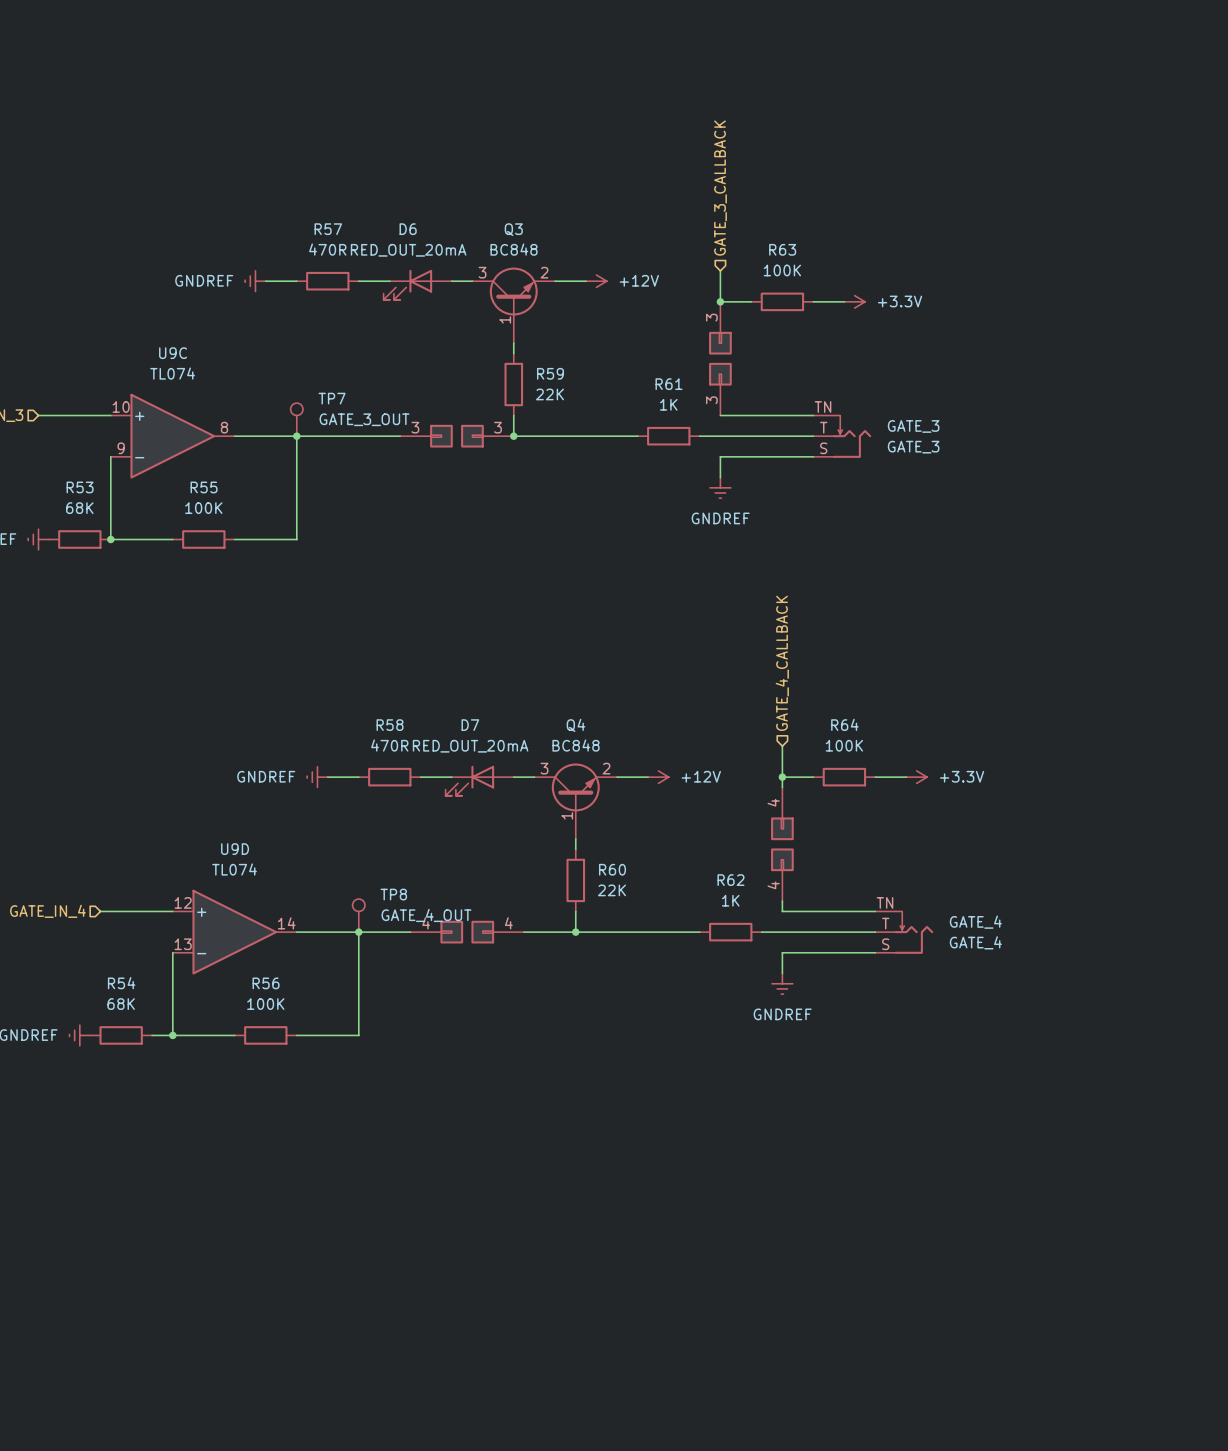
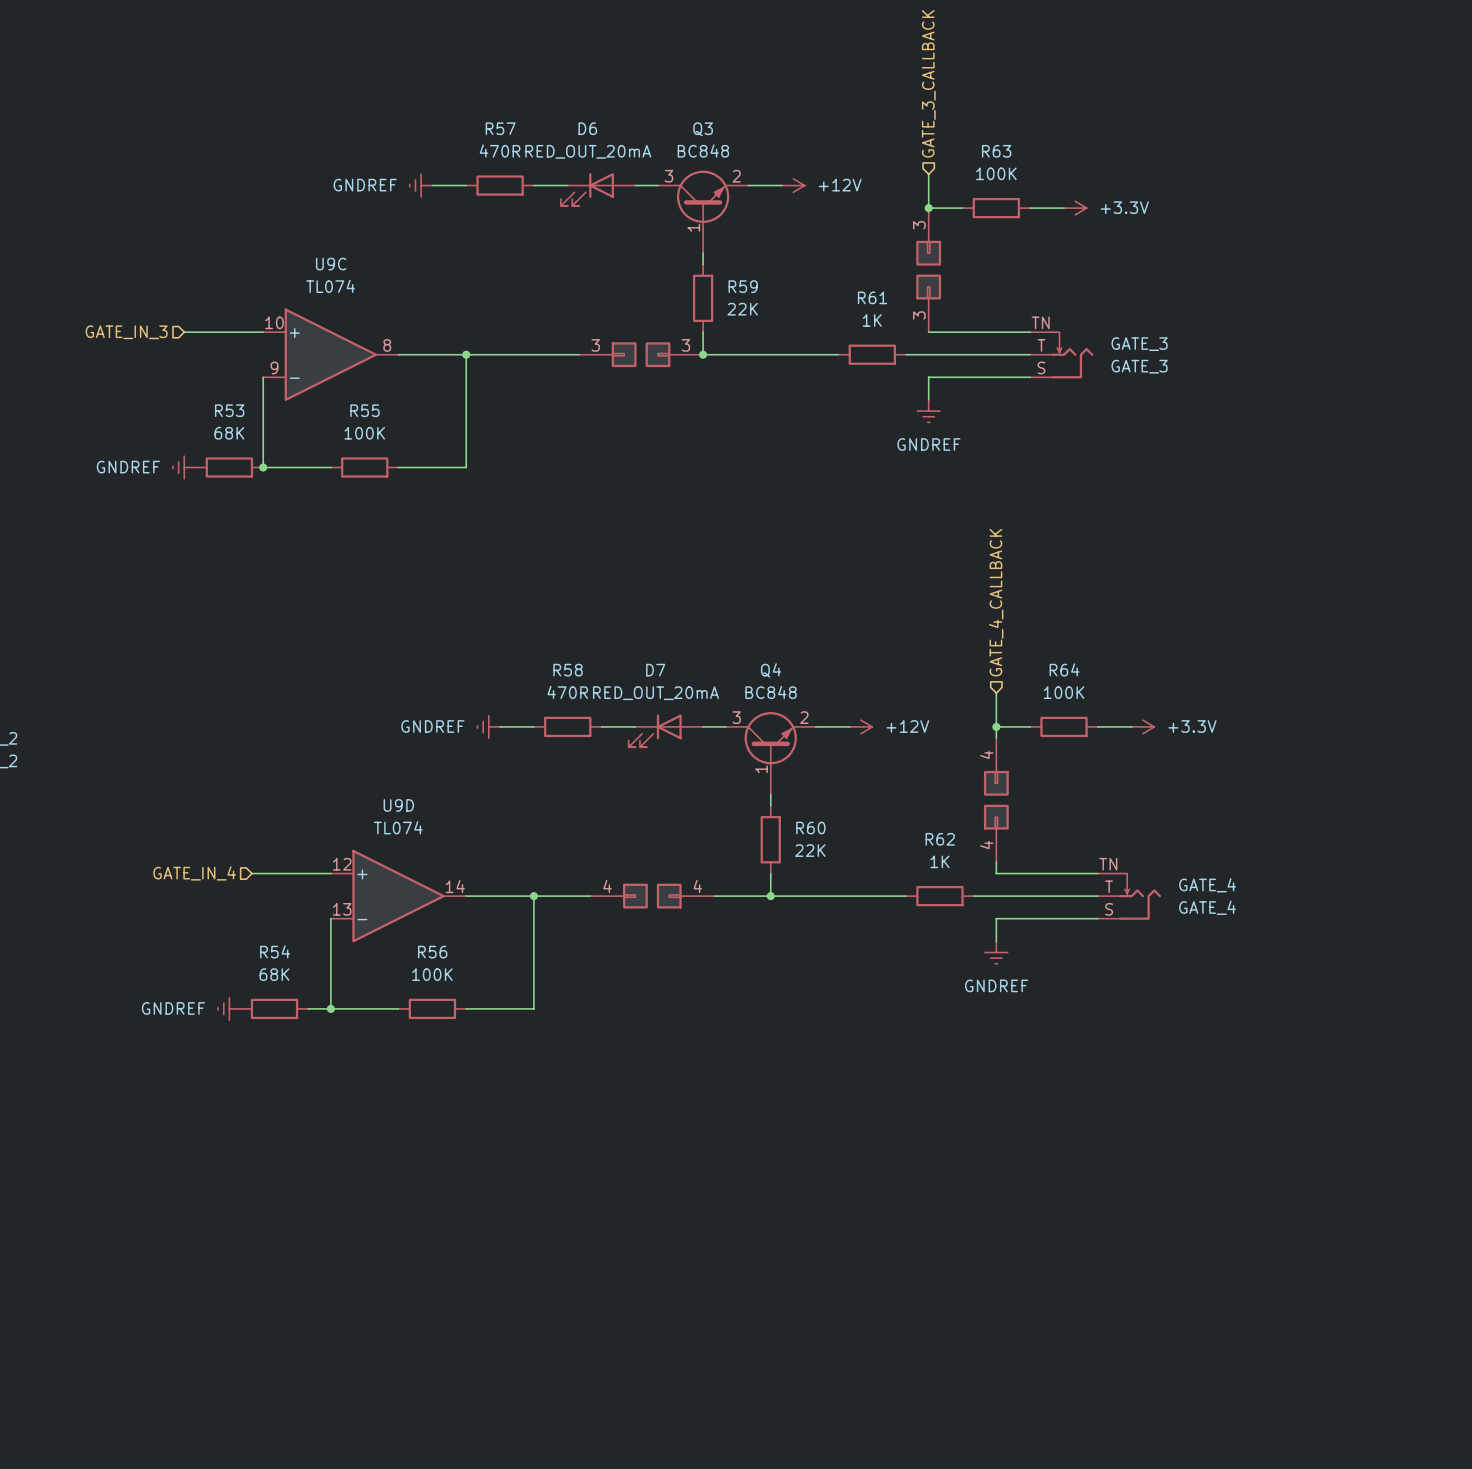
TP7: GATE_3_OUT (296, 419) -> none
TP8: GATE_4_OUT (358, 915) -> none

